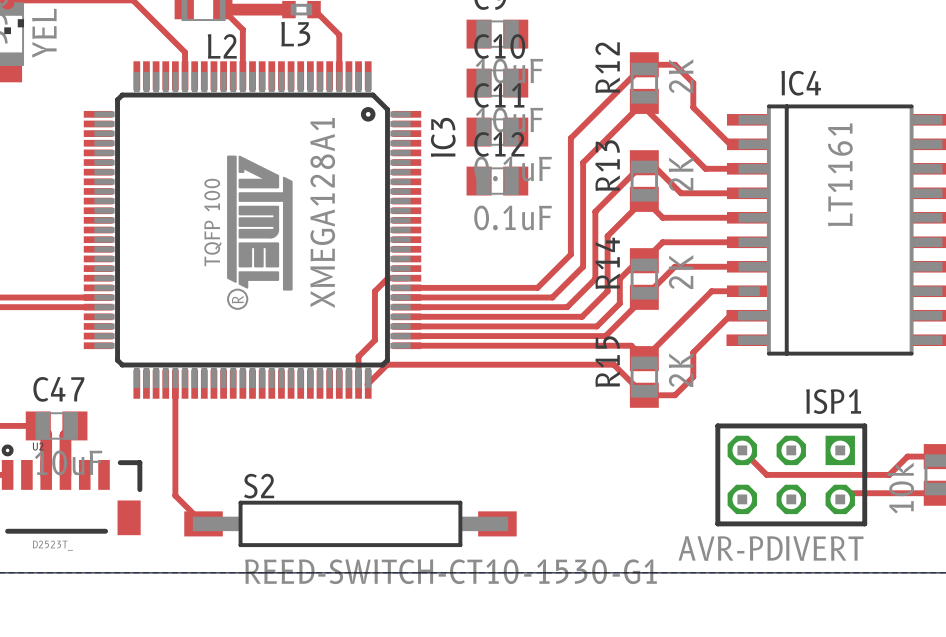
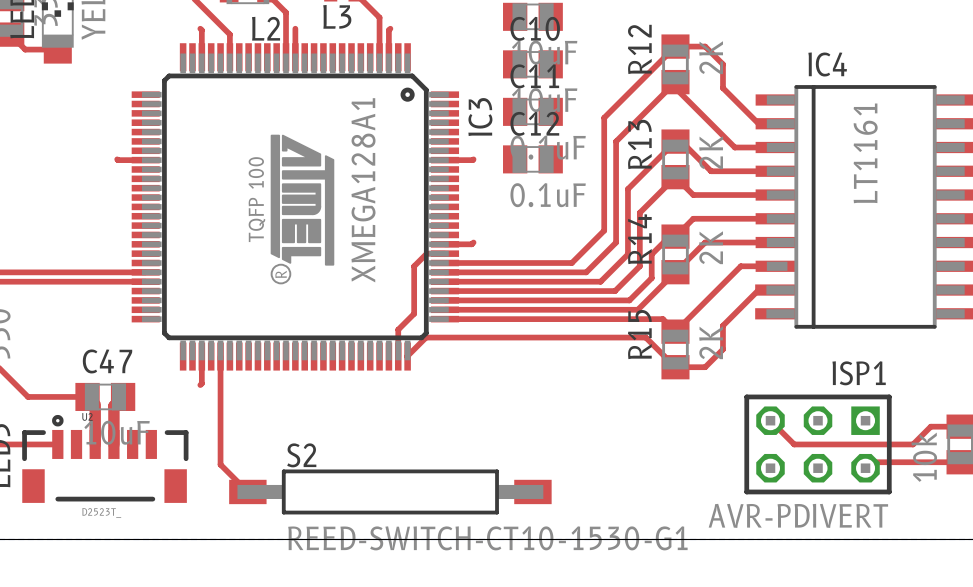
top track: none -> (200, 28) (201, 57)
top track: none -> (295, 28) (295, 57)
top track: none -> (390, 28) (388, 57)
top track: none -> (117, 159) (145, 160)
top track: none -> (473, 159) (445, 160)
top track: none -> (473, 242) (471, 244) (445, 244)
top track: none -> (201, 356) (200, 385)

